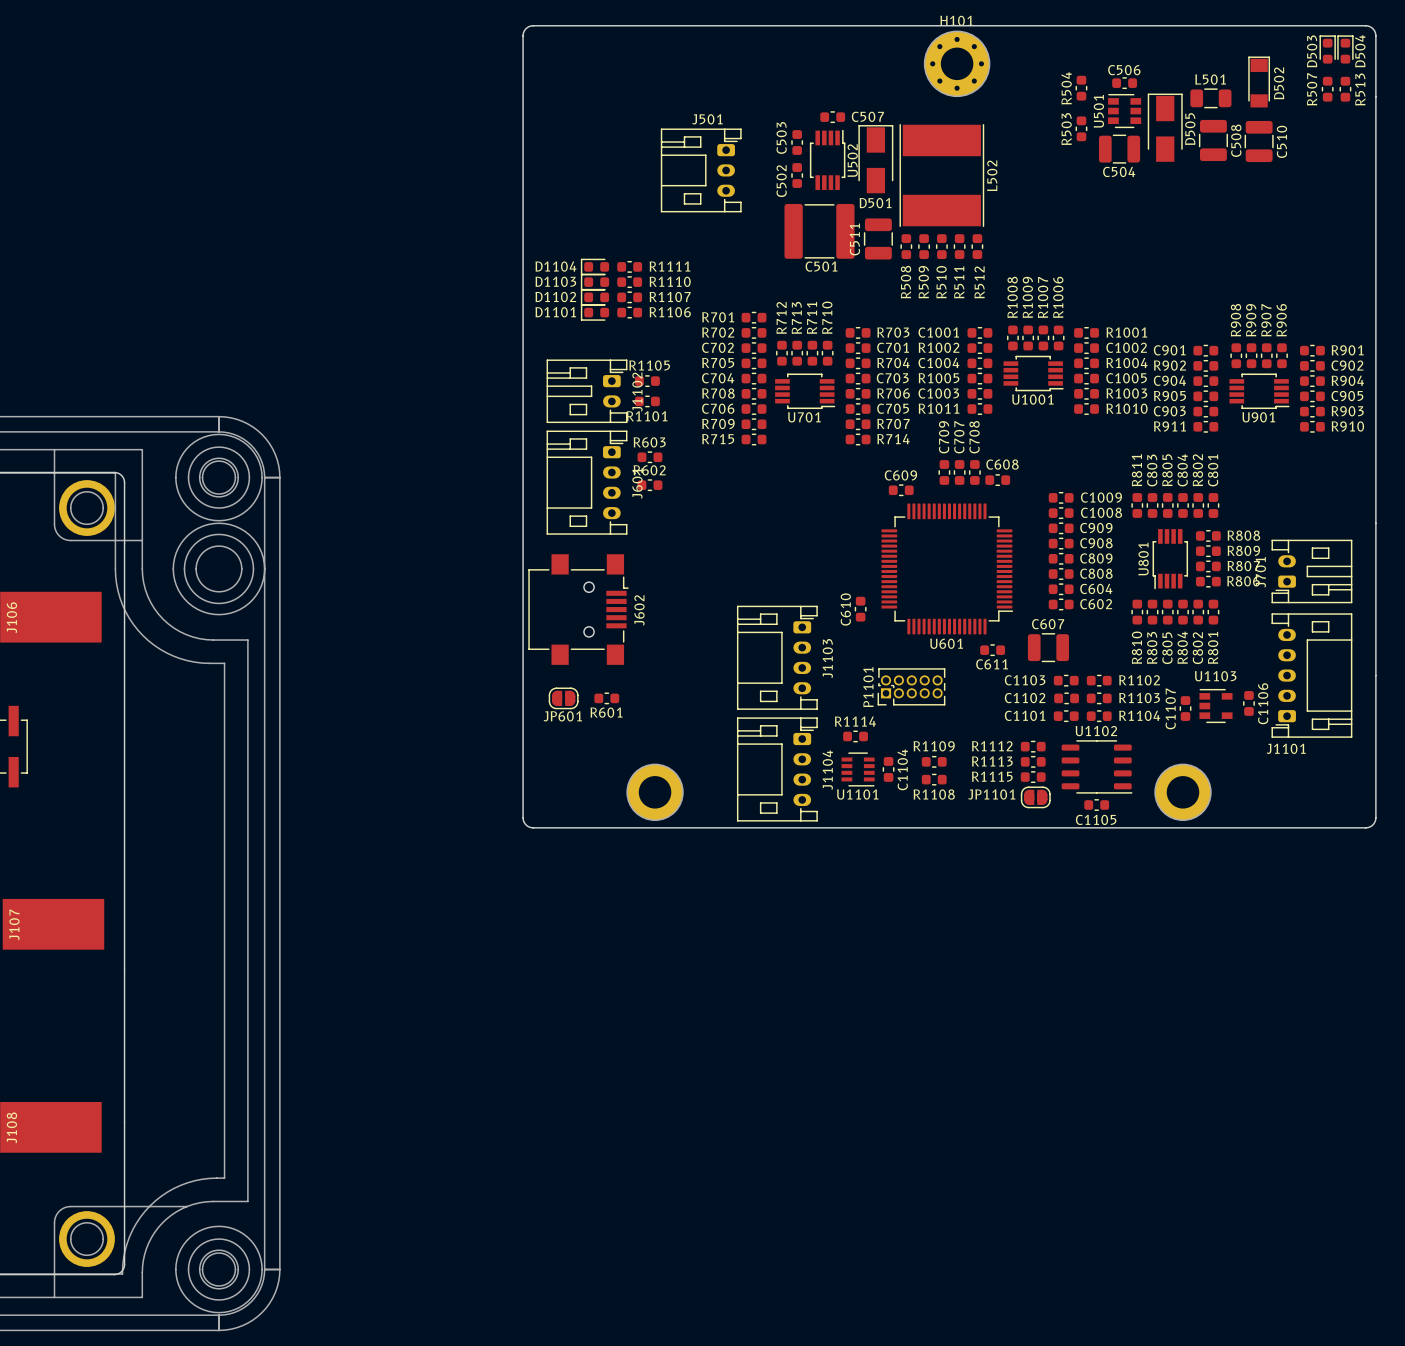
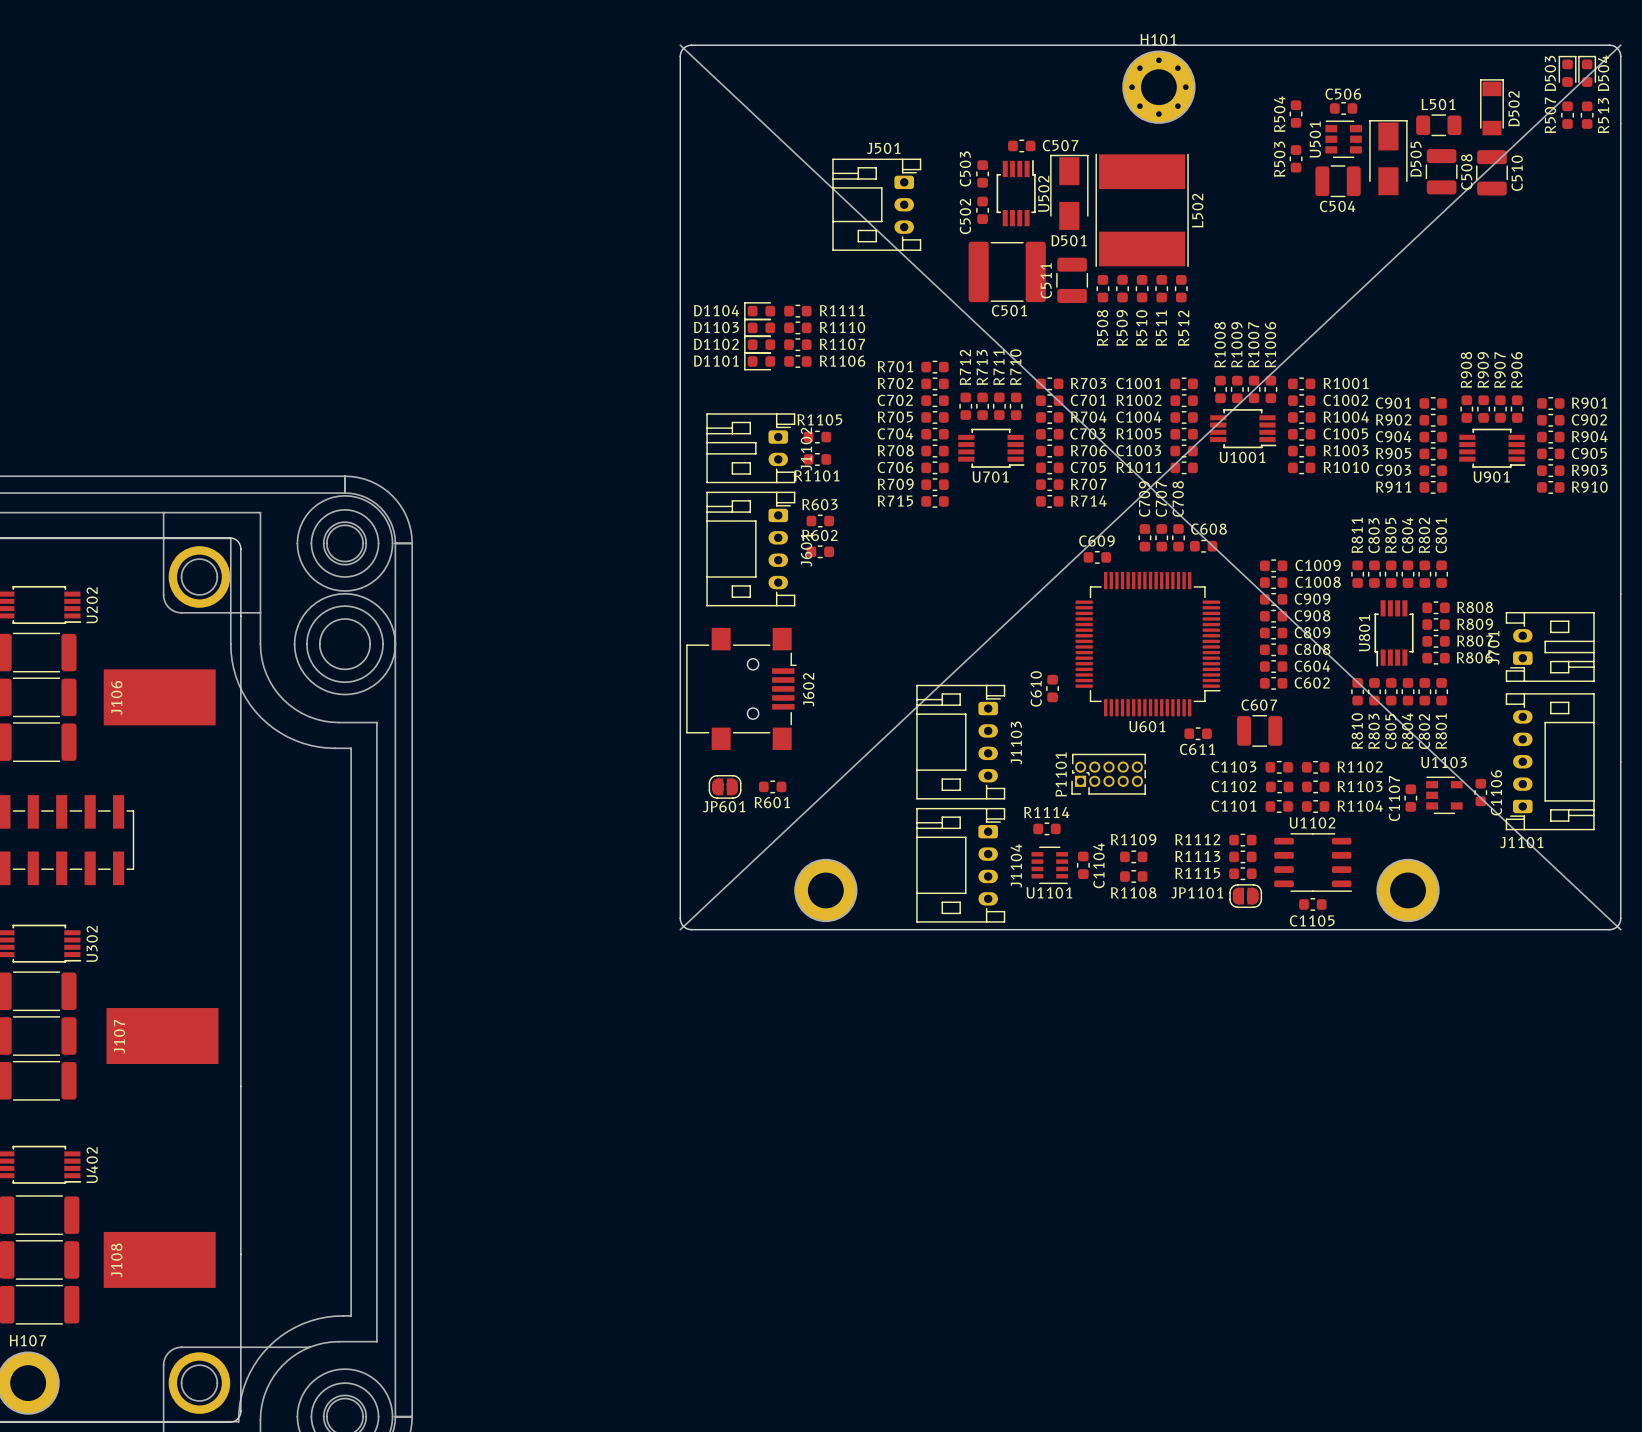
line: none -> (680, 45) (1620, 929)
line: none -> (1620, 45) (680, 929)

